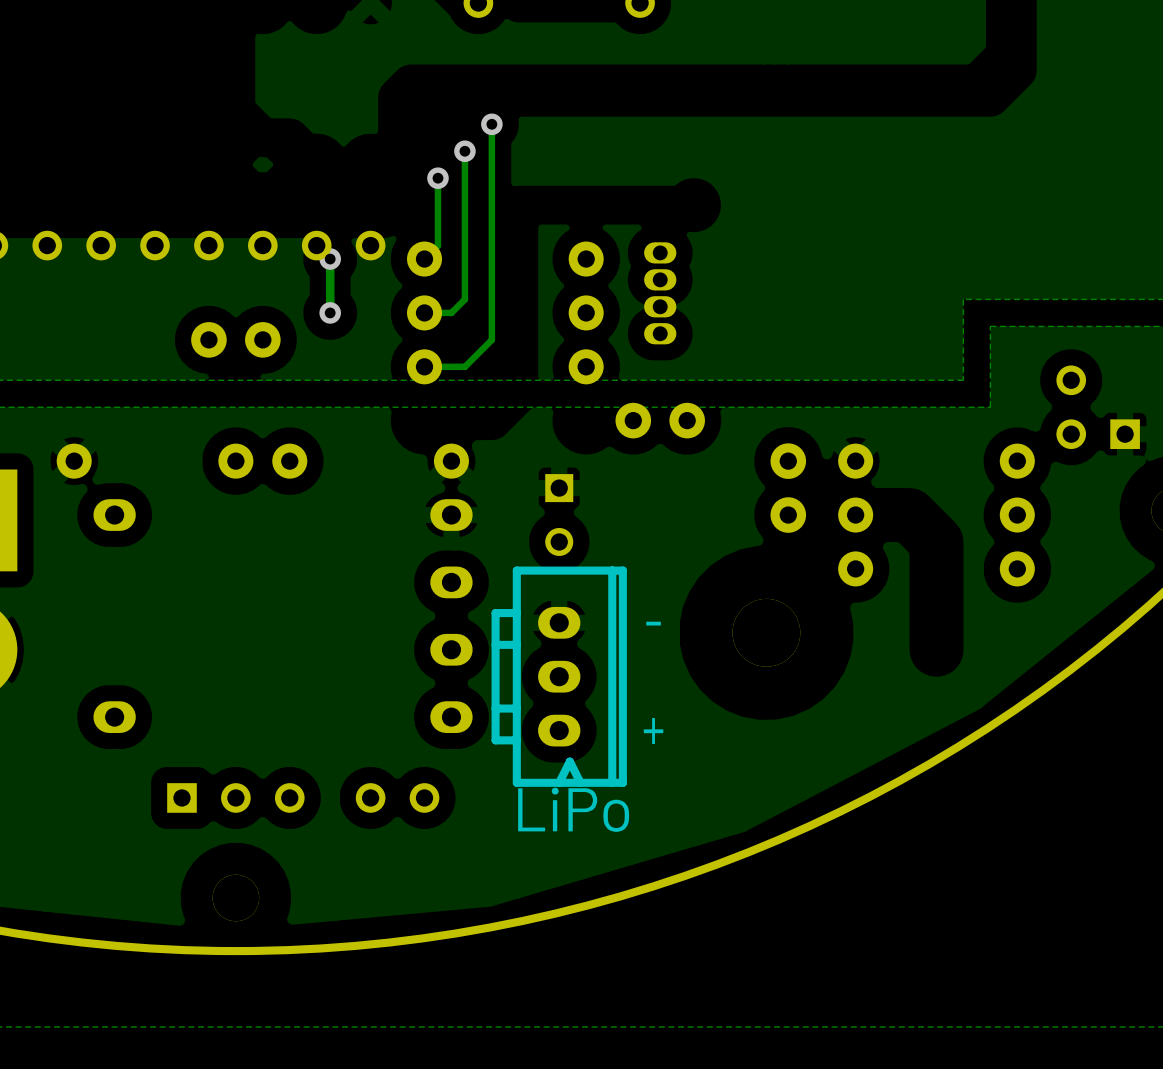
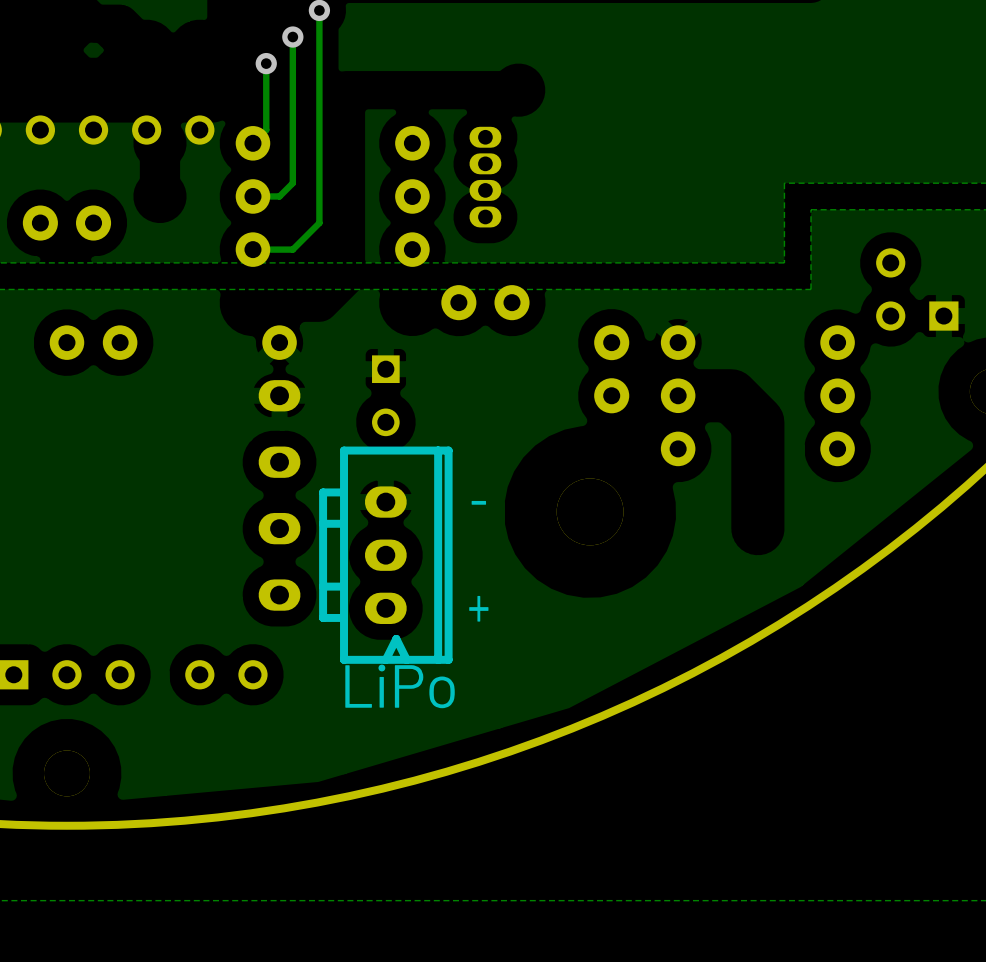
track: (330, 259) (330, 312) -> none
via: (330, 259) -> none
via: (330, 312) -> none

